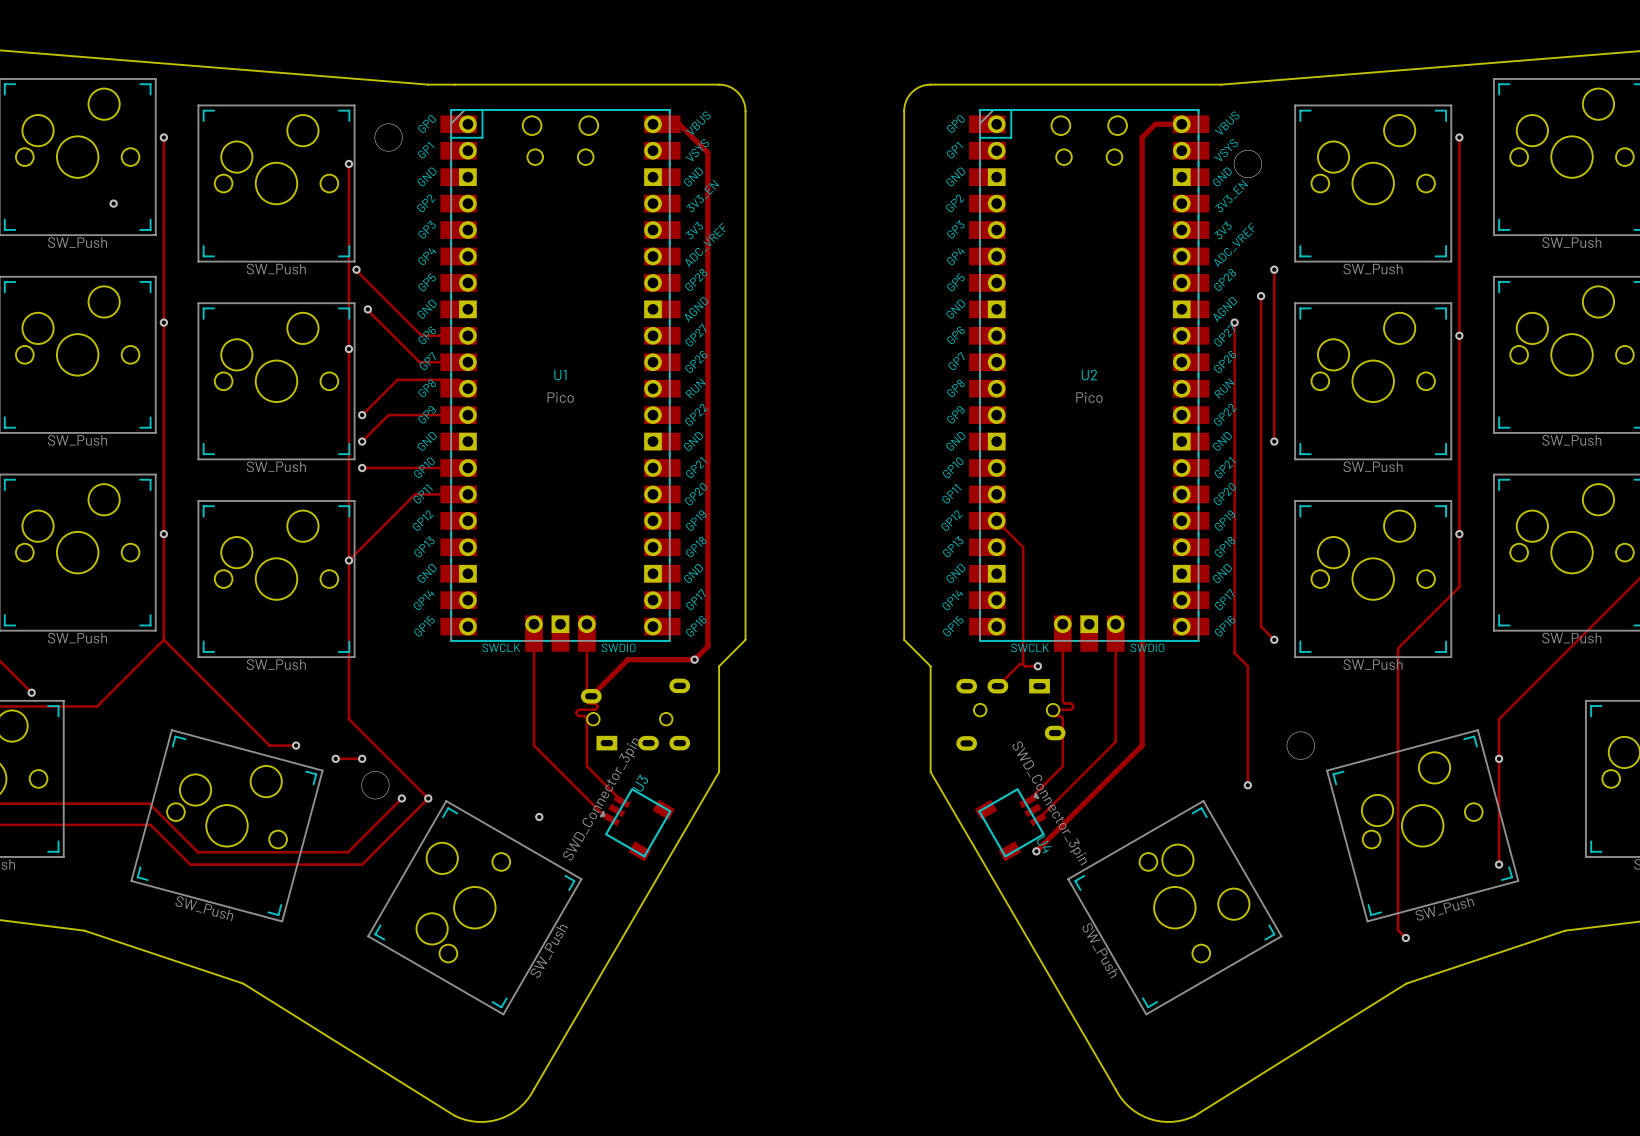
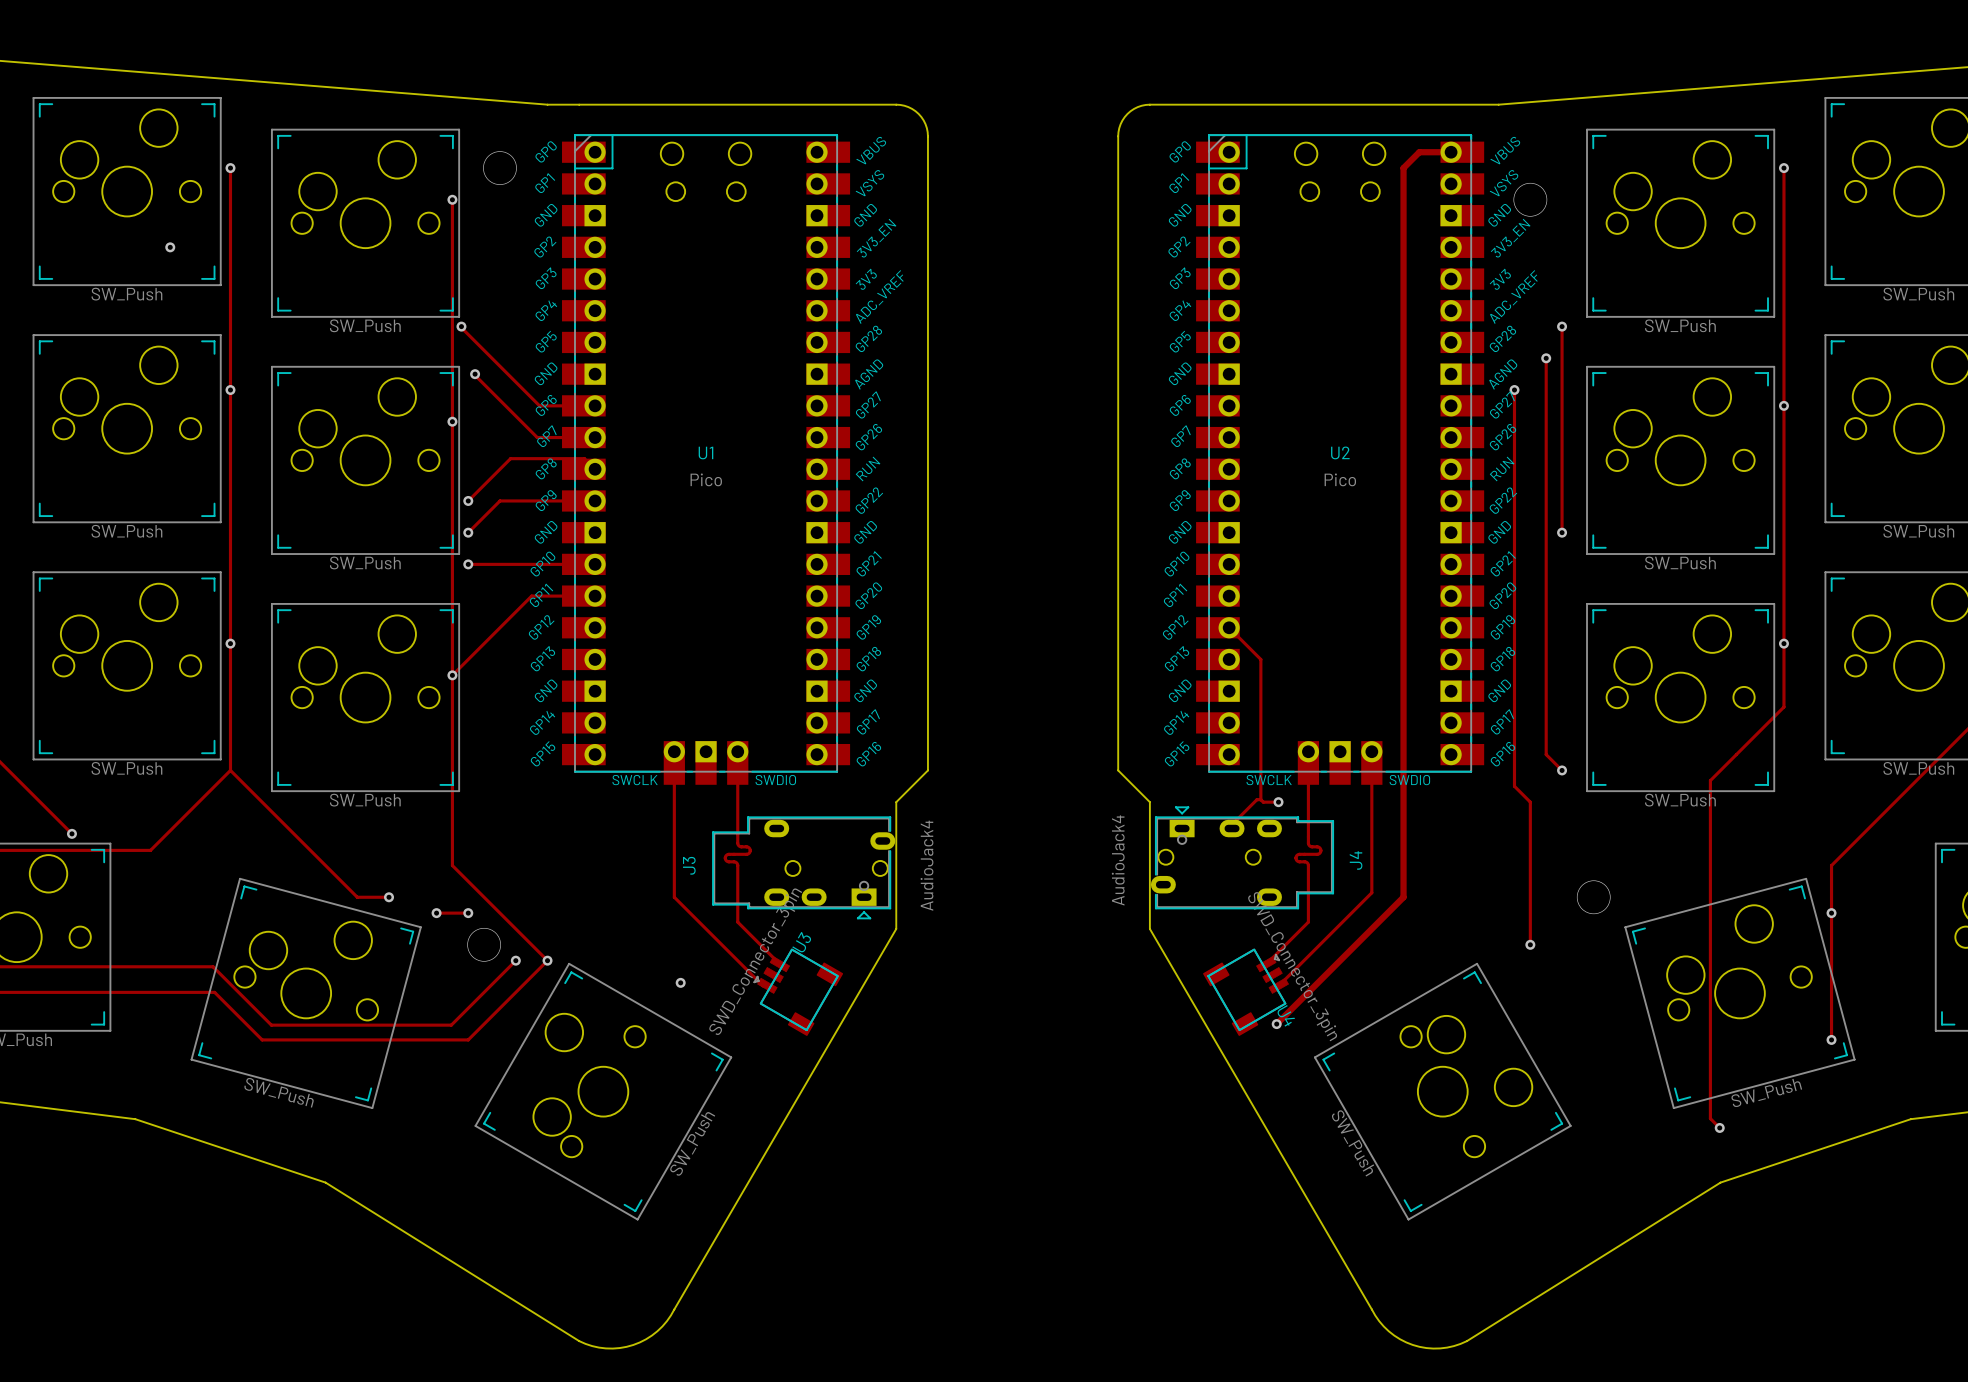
track: (653, 124) (679, 124) (707, 152) (707, 646) (694, 659) (627, 659) (592, 695) -> none
via: (694, 659) -> none
J3 side: bottom (635, 714) -> top (803, 867)
J4 side: bottom (1010, 714) -> top (1242, 857)

